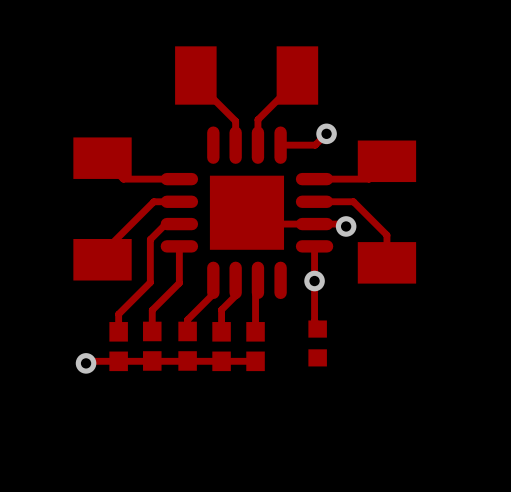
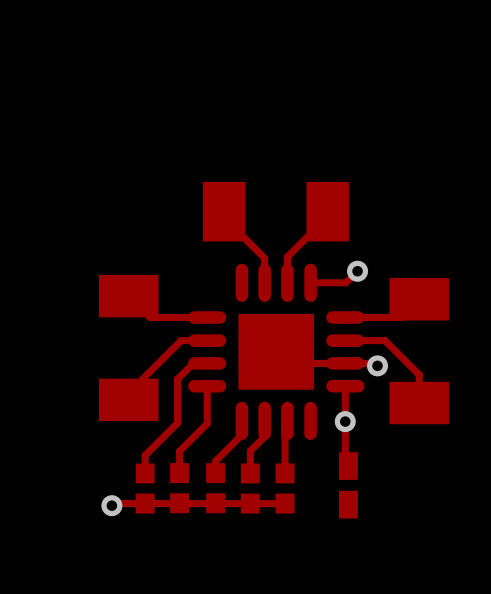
part footprint: [308, 320, 327, 367] -> [338, 452, 358, 519]

